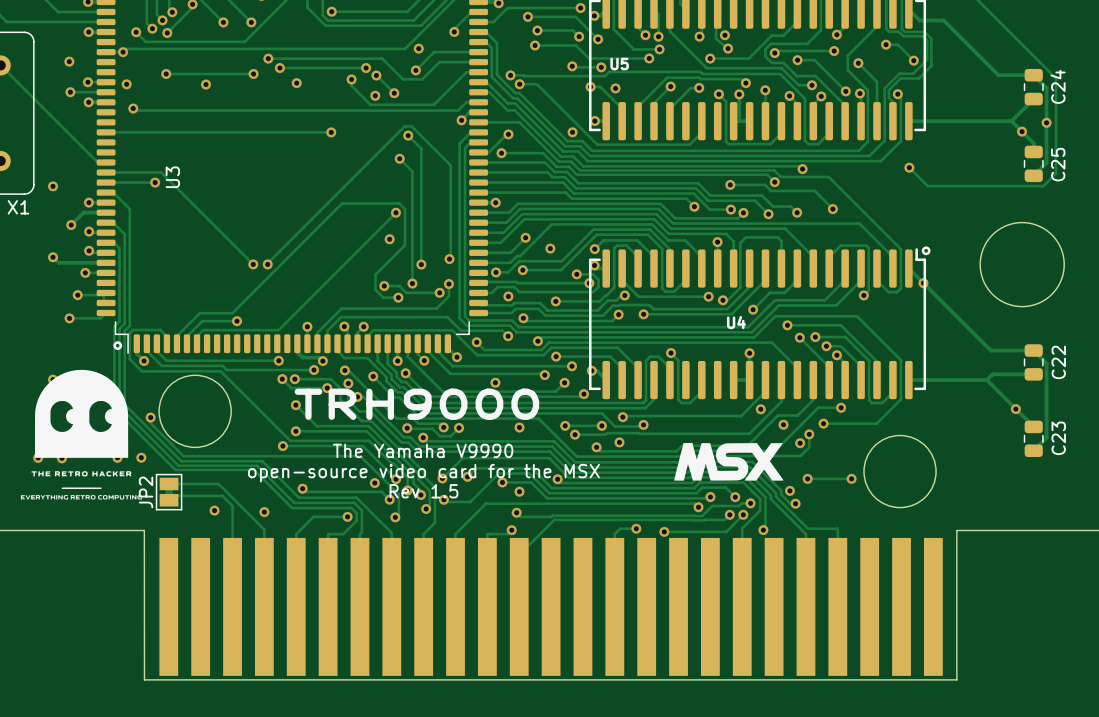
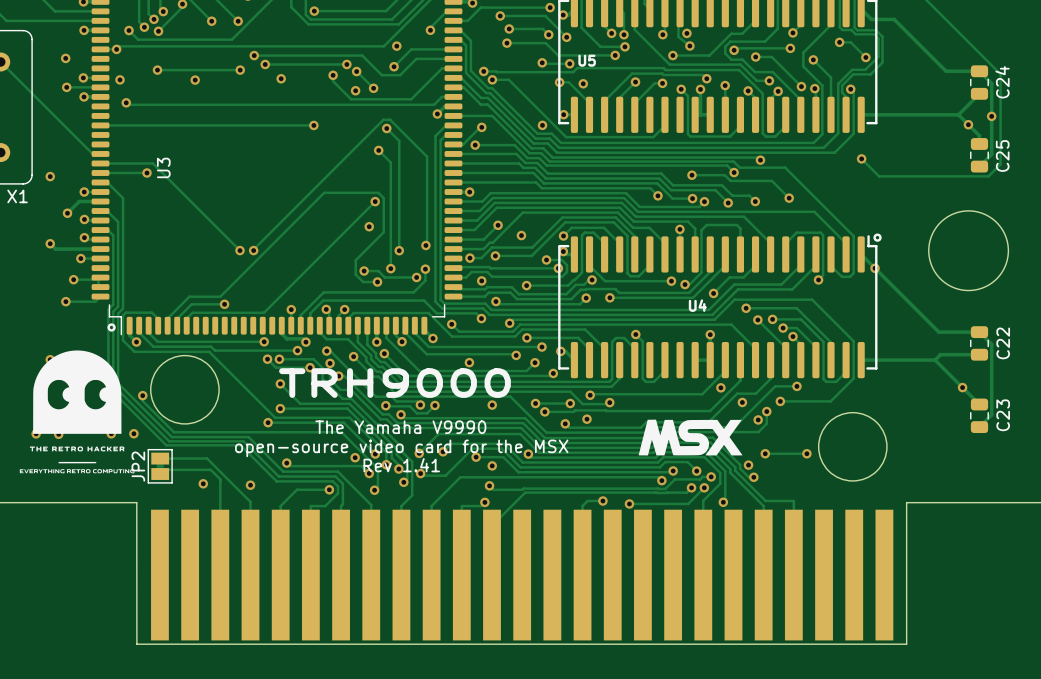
text: Rev 1.5 (423, 491) -> Rev 1.41 (401, 465)

